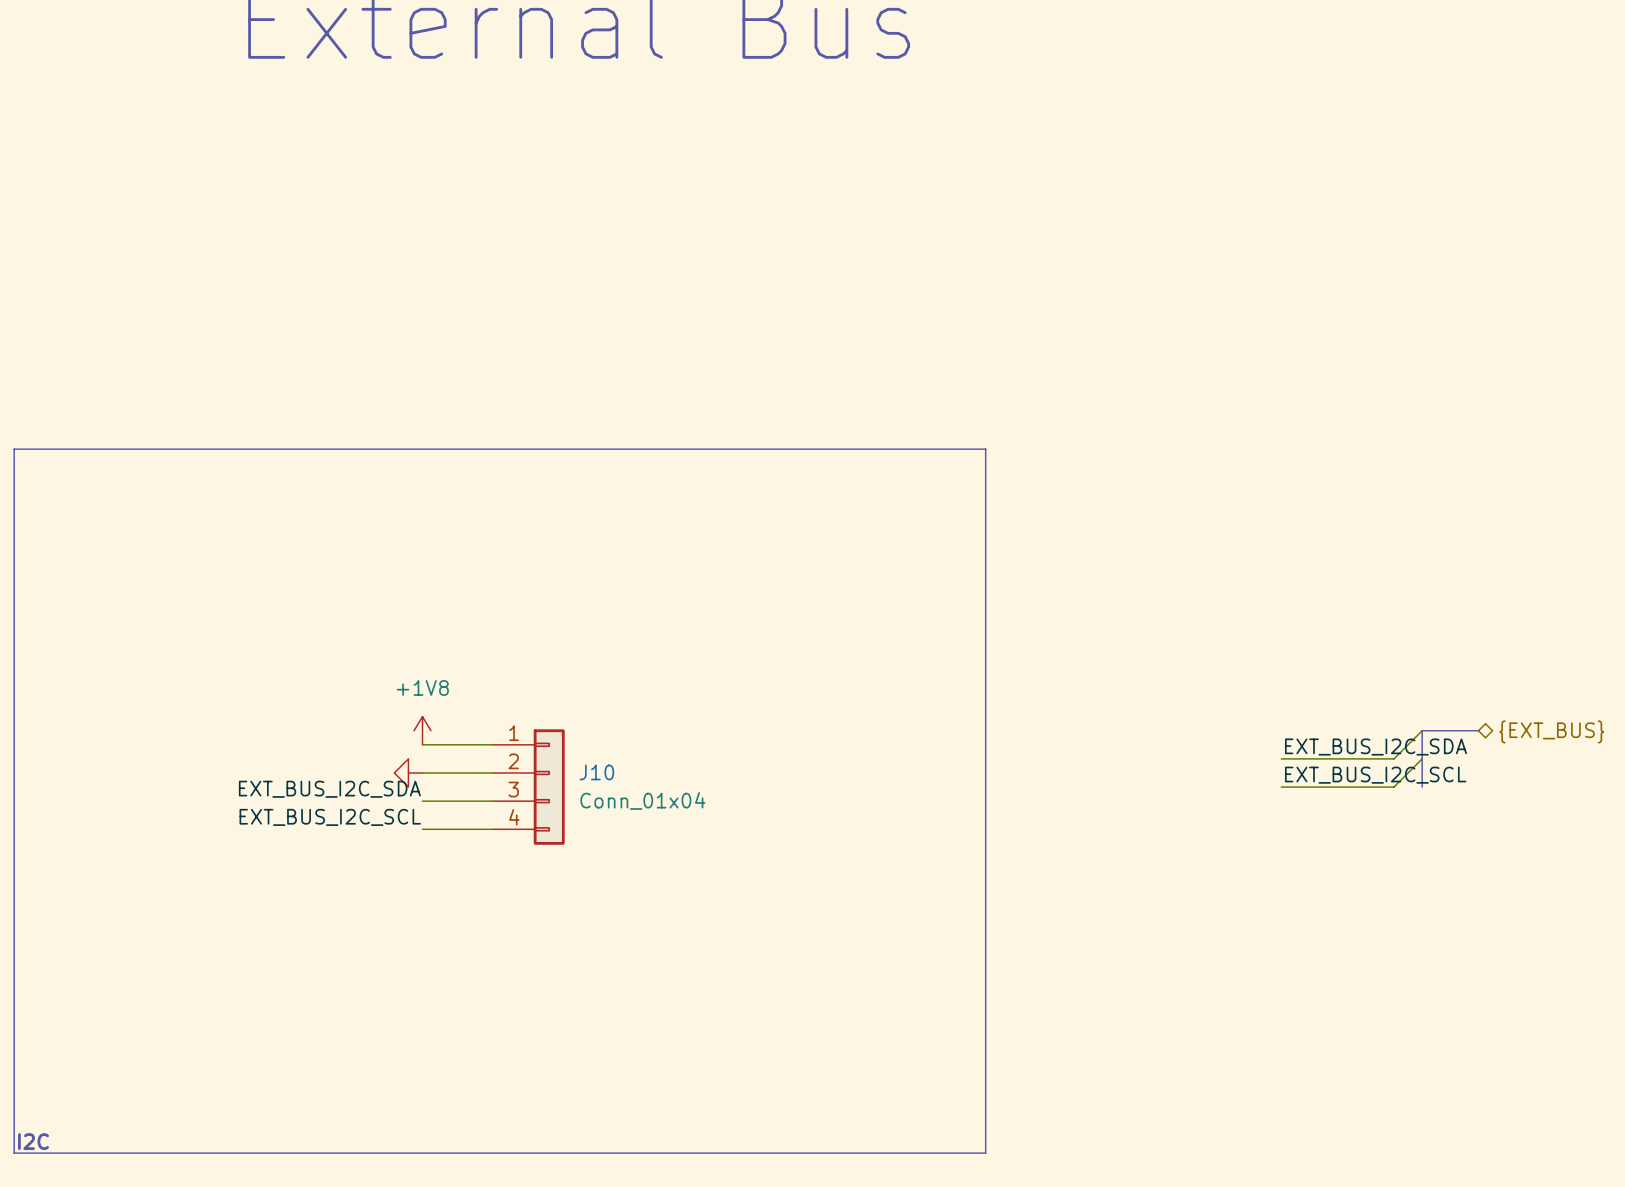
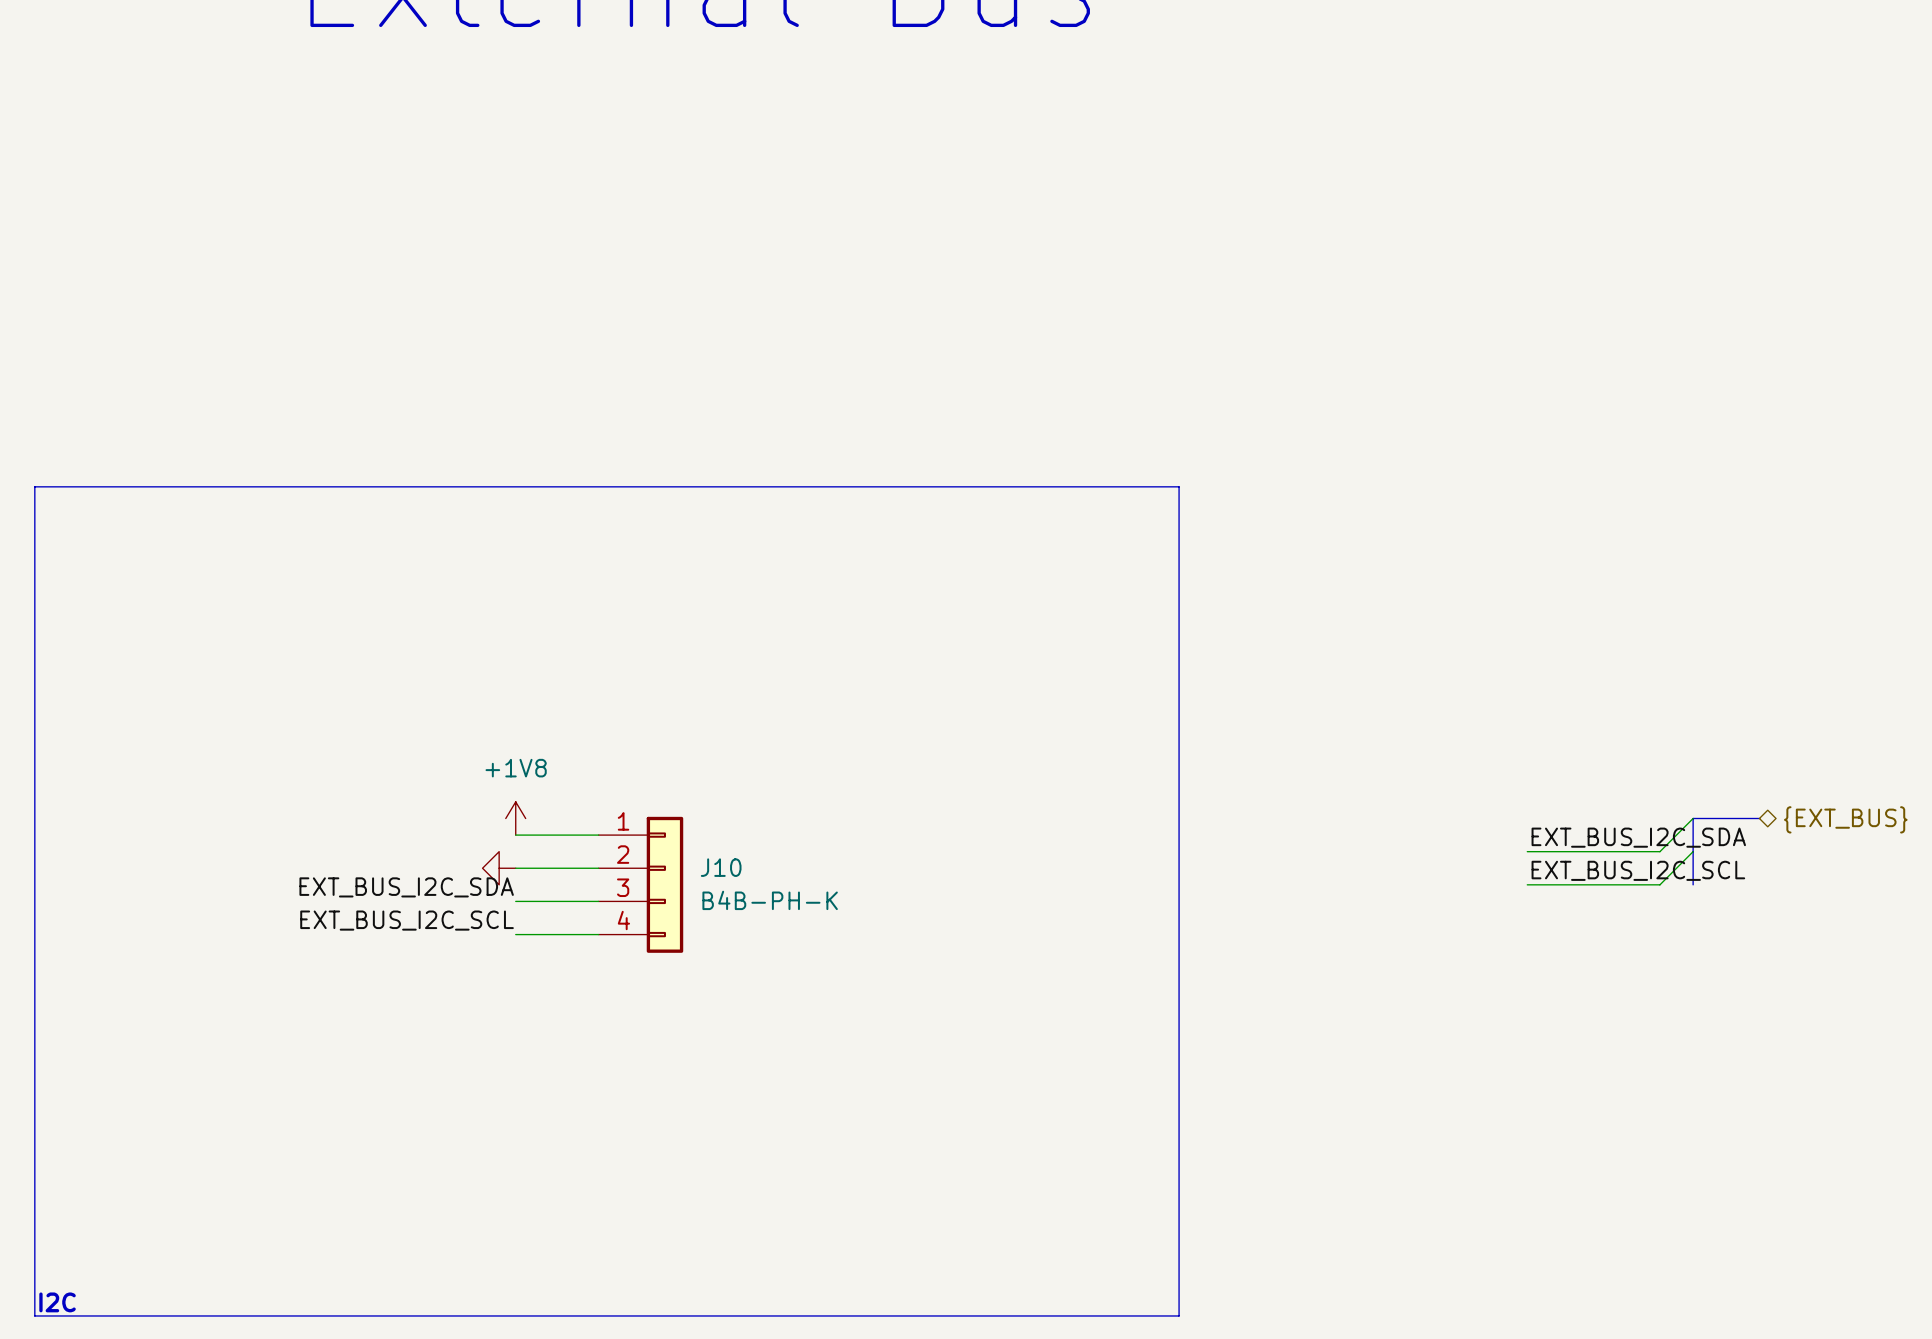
J10 value: Conn_01x04 (642, 800) -> B4B-PH-K (770, 900)

